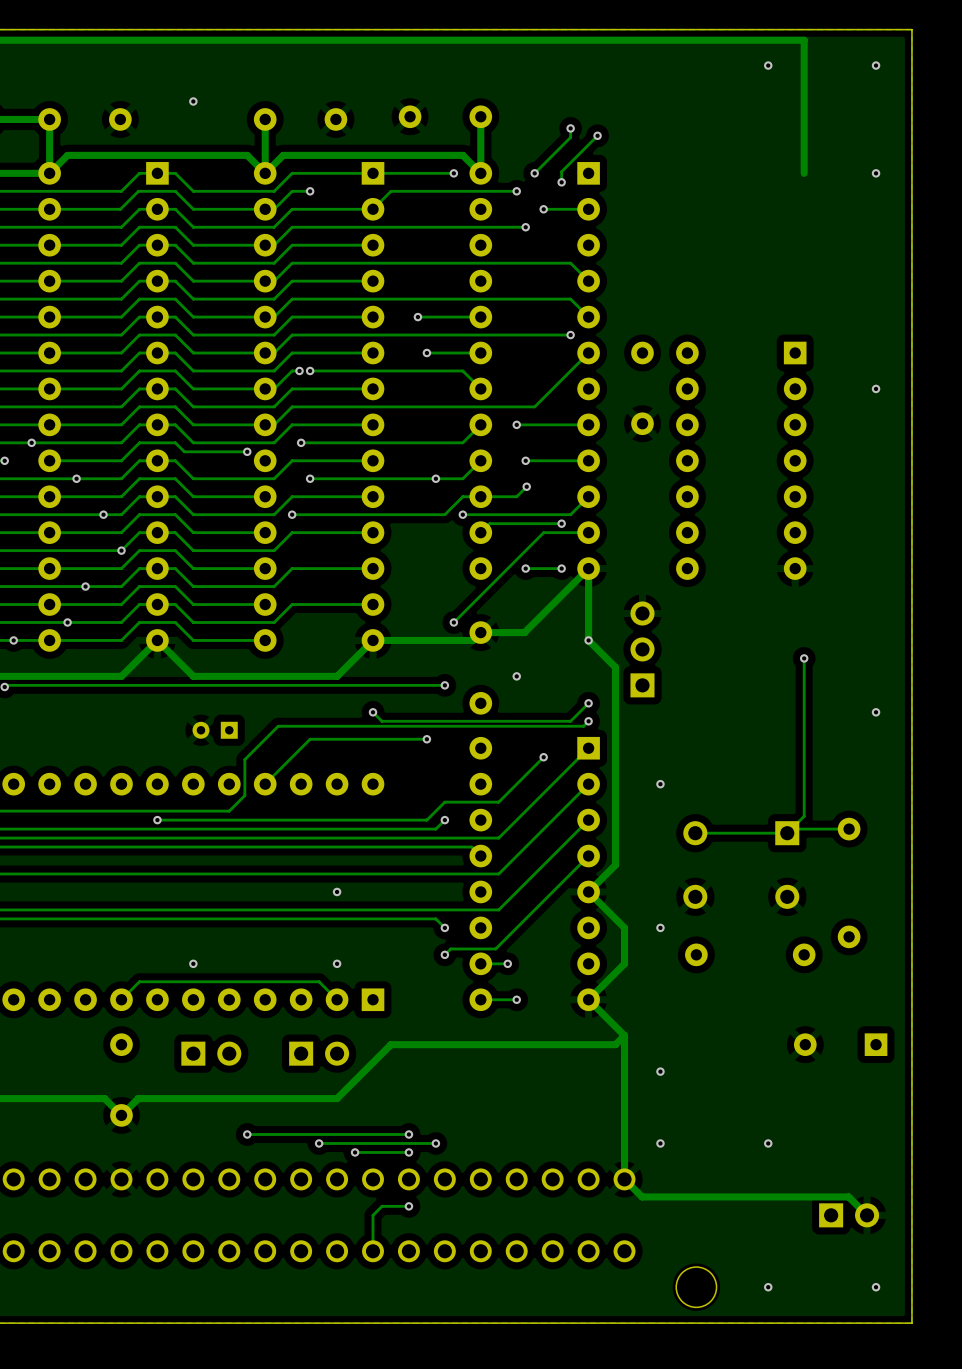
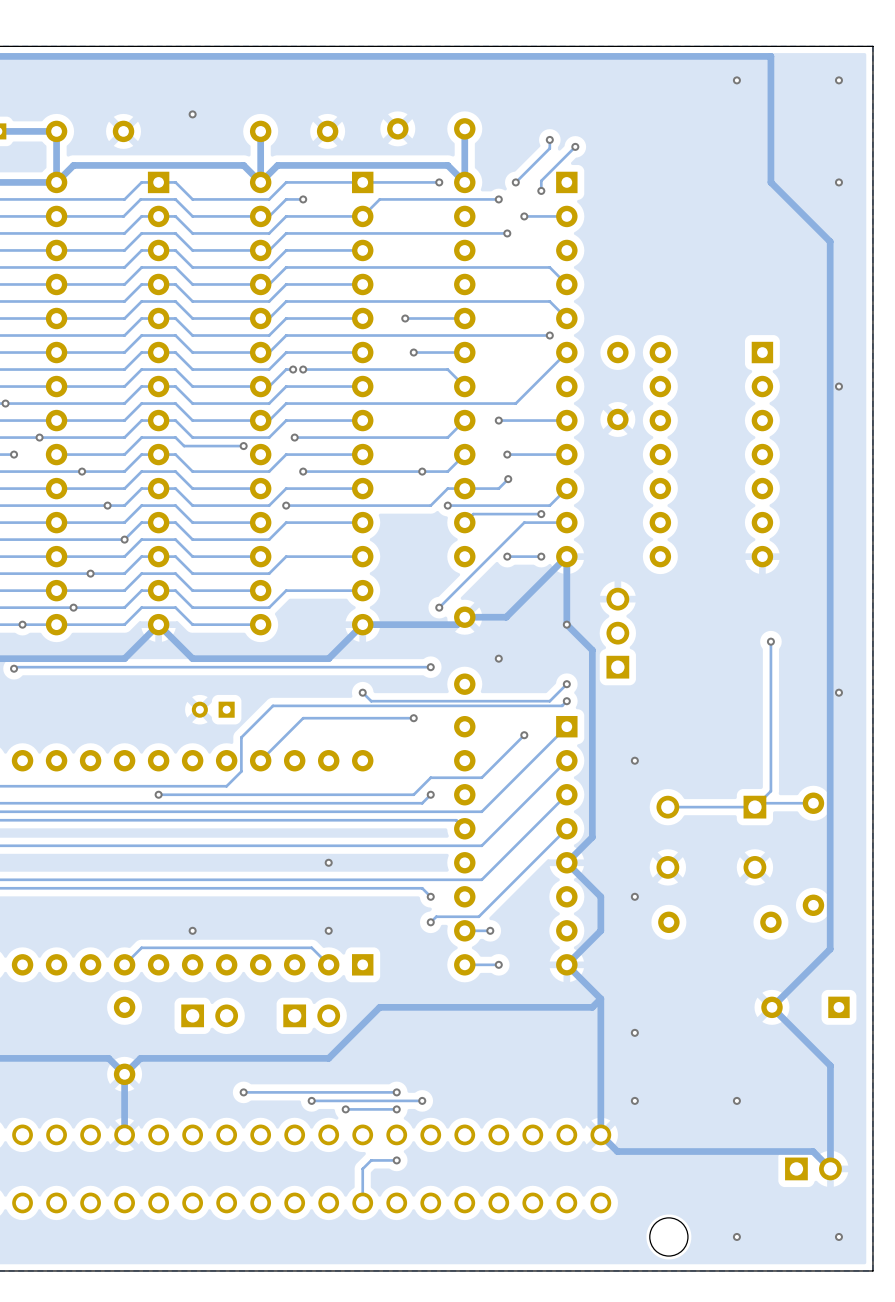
track: none -> (770, 182) (830, 241) (830, 949) (772, 1007) (830, 1065) (830, 1168)
track: none -> (124, 1074) (124, 1134)

